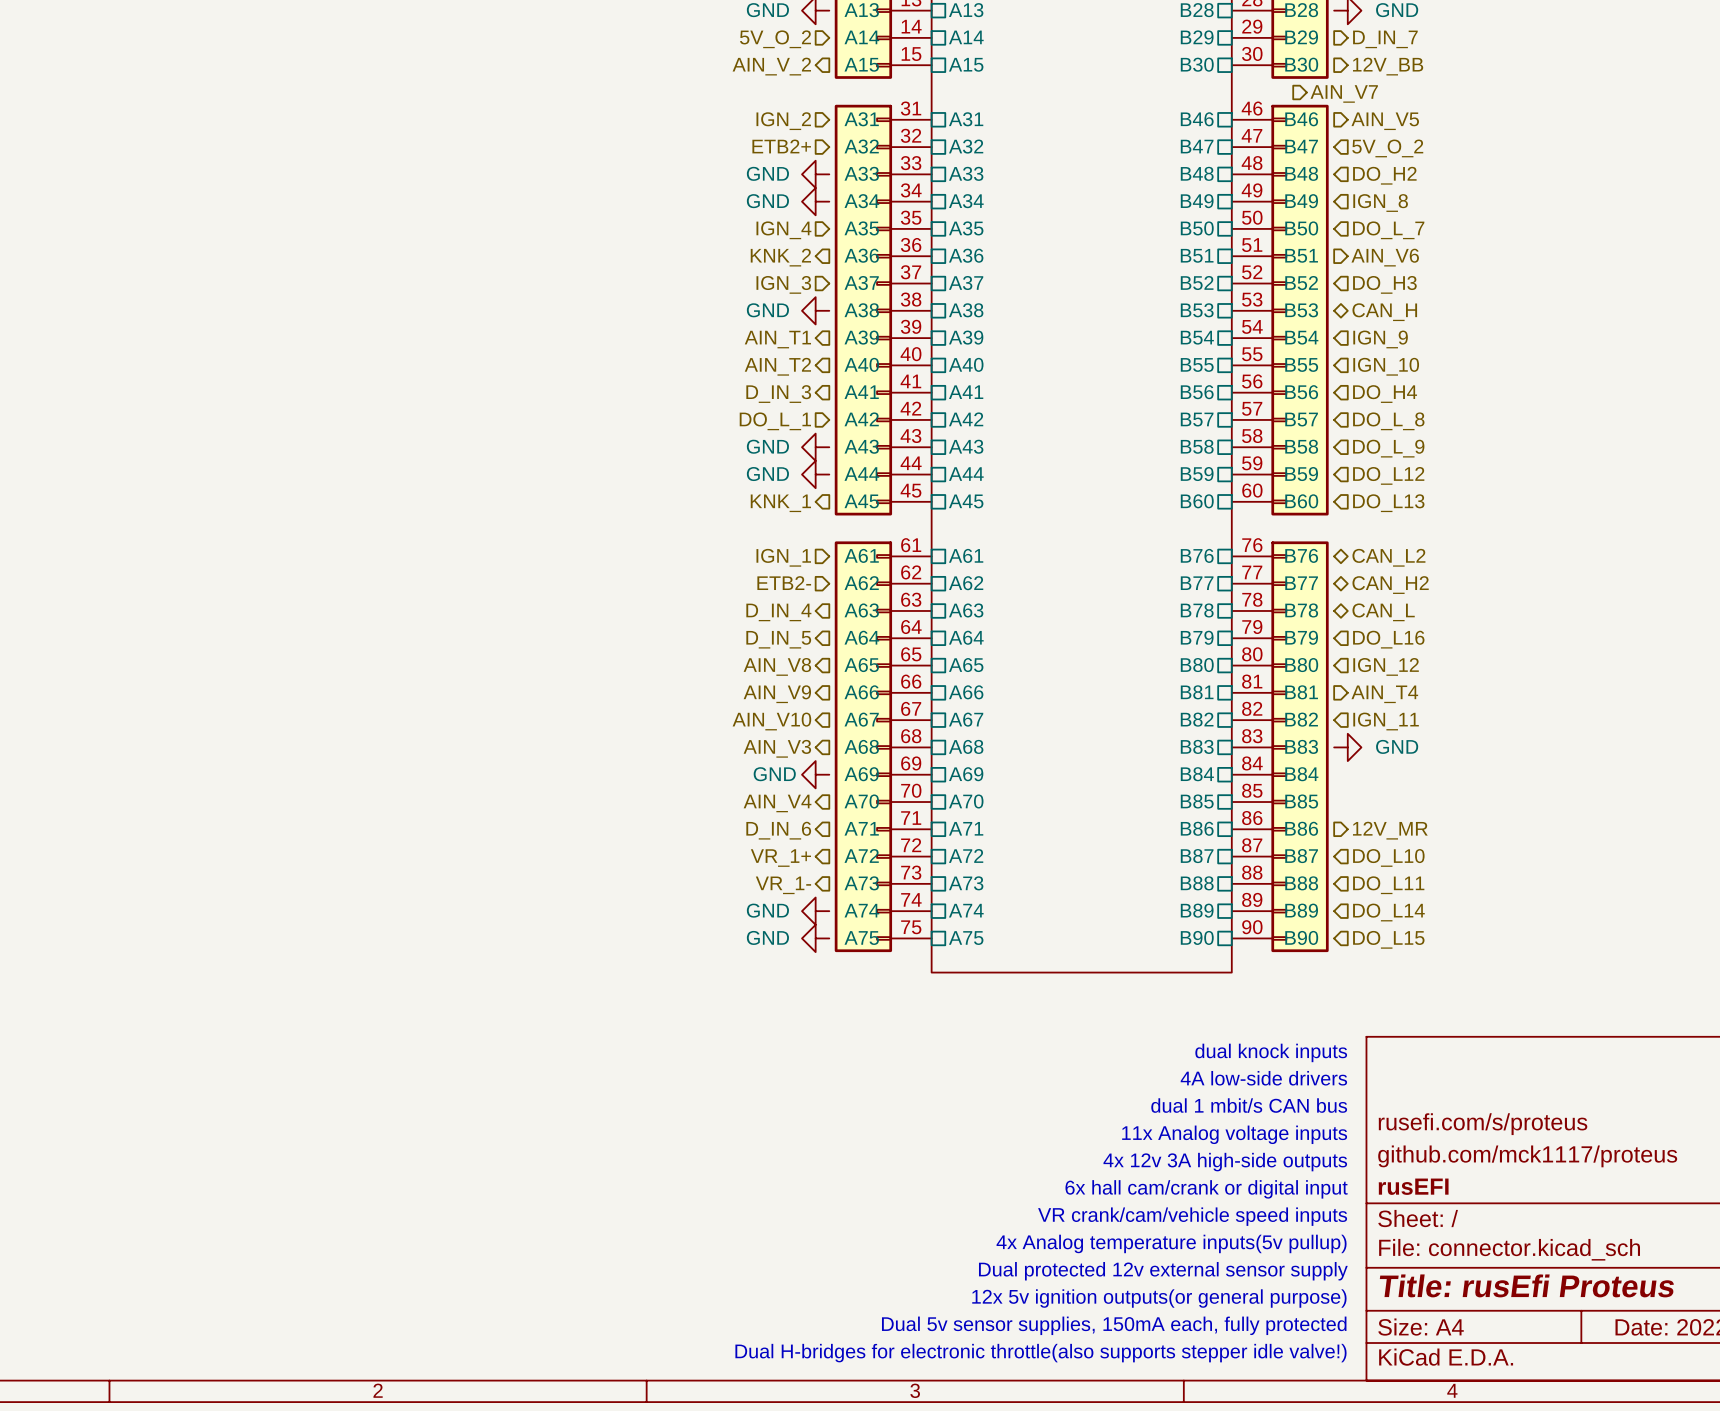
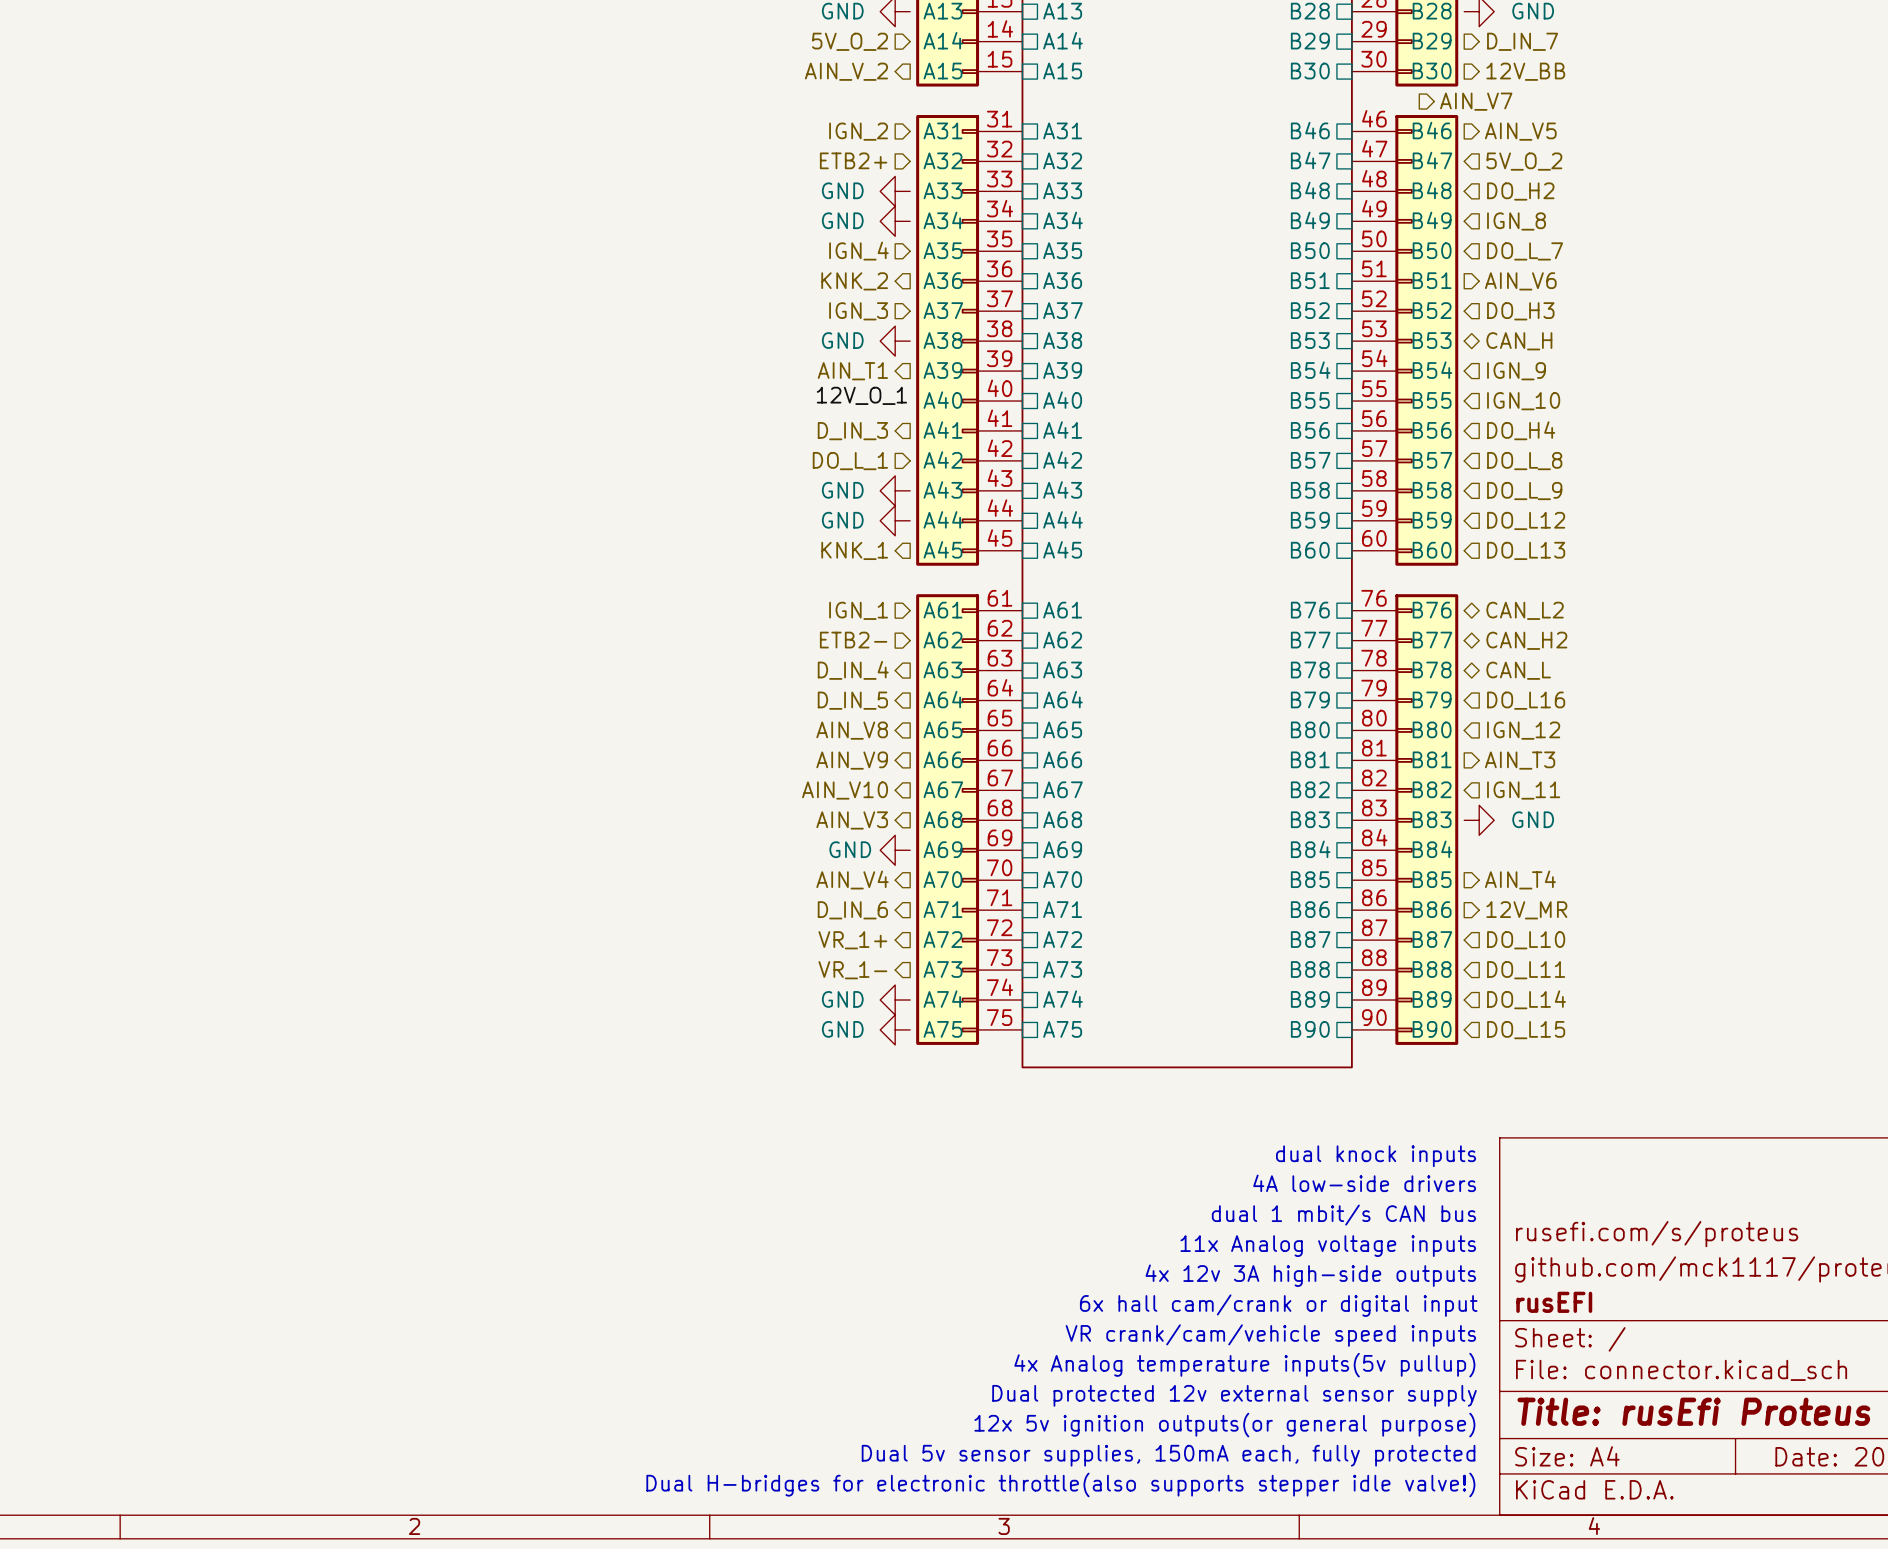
label: none -> 12V_O_1 (861, 395)
hierarchical label: AIN_T2 (777, 366) -> none
hierarchical label: AIN_T4 (1384, 694) -> AIN_T3 (1520, 760)
hierarchical label: none -> AIN_T4 (1520, 880)

